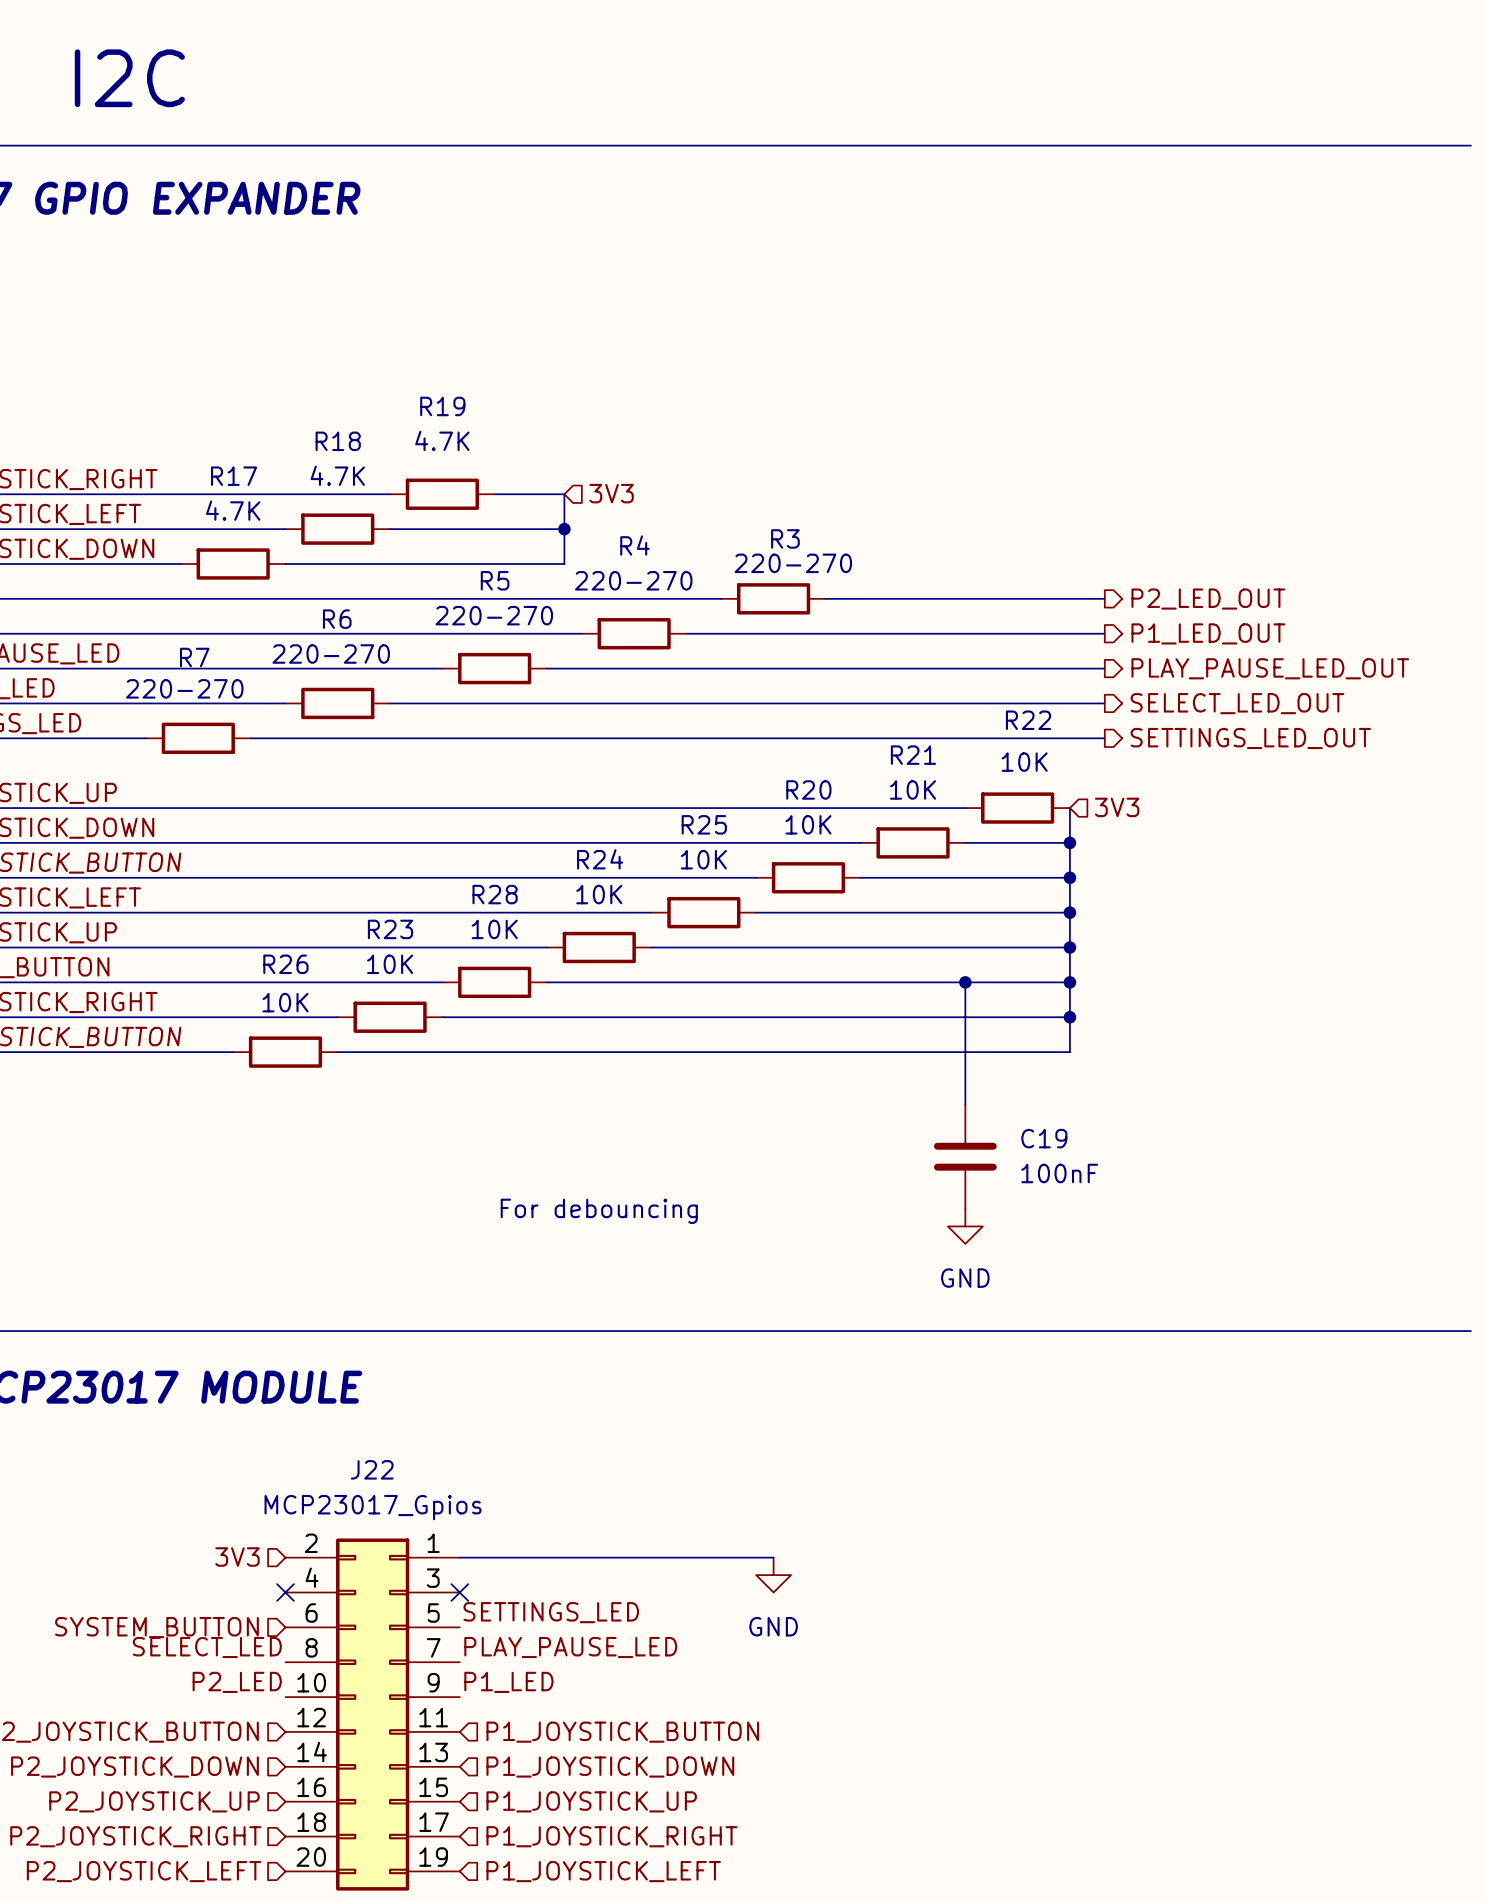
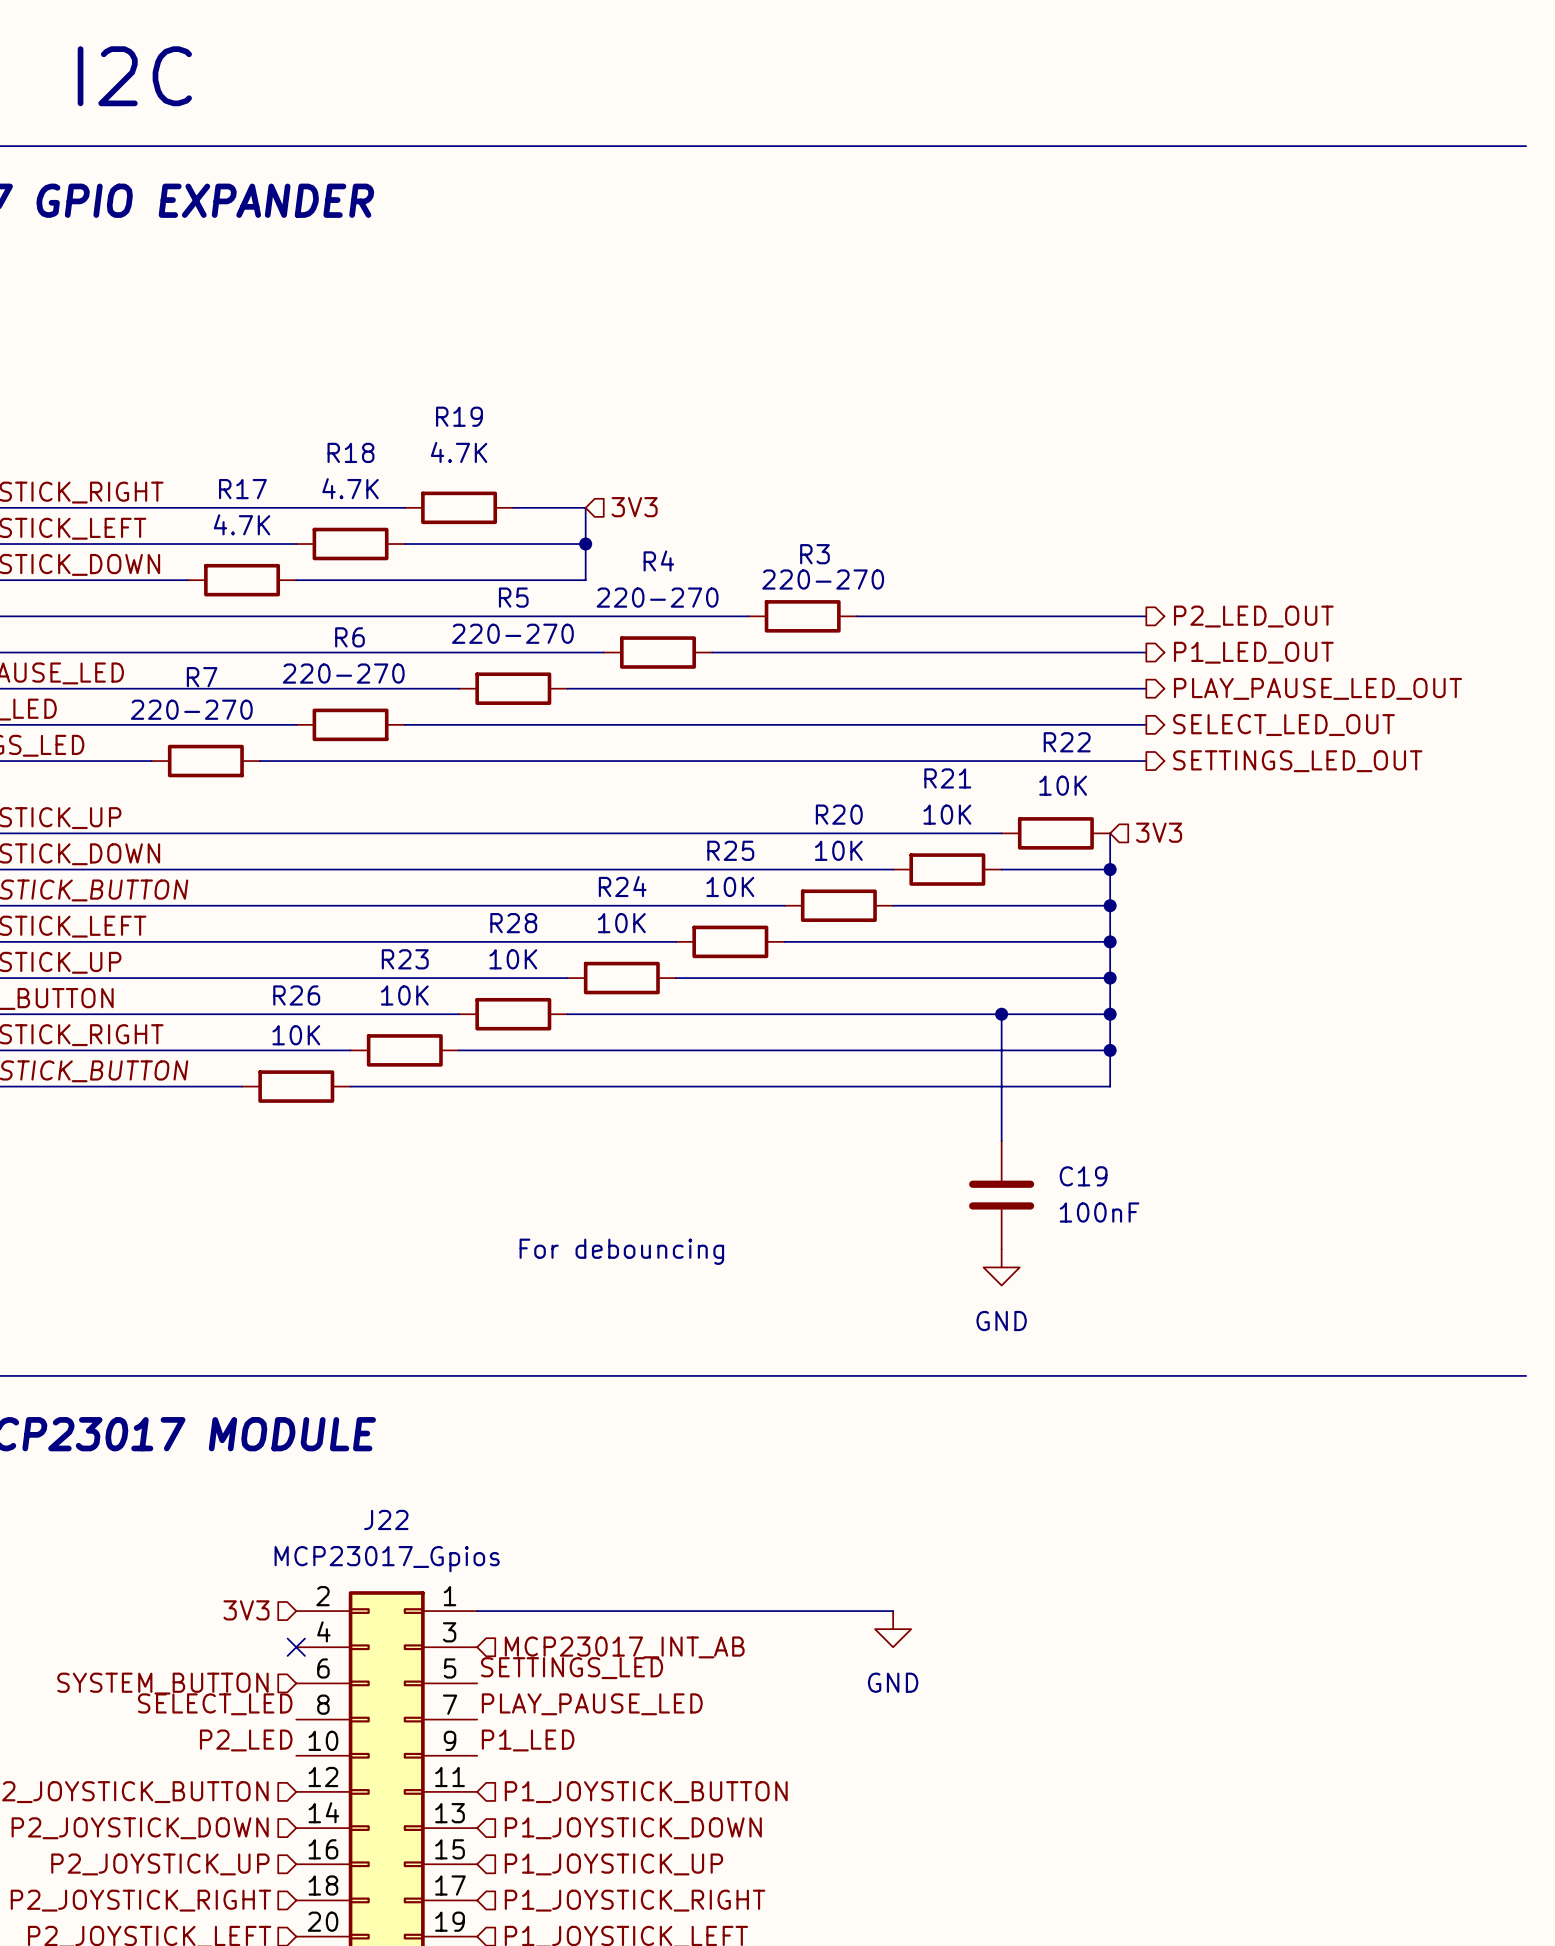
wire: none -> (802, 1611) (893, 1611)
power symbol position: GND (773, 1575) -> GND (893, 1629)
no-connect mark: (459, 1592) -> none
hierarchical label: none -> MCP23017_INT_AB (624, 1647)

